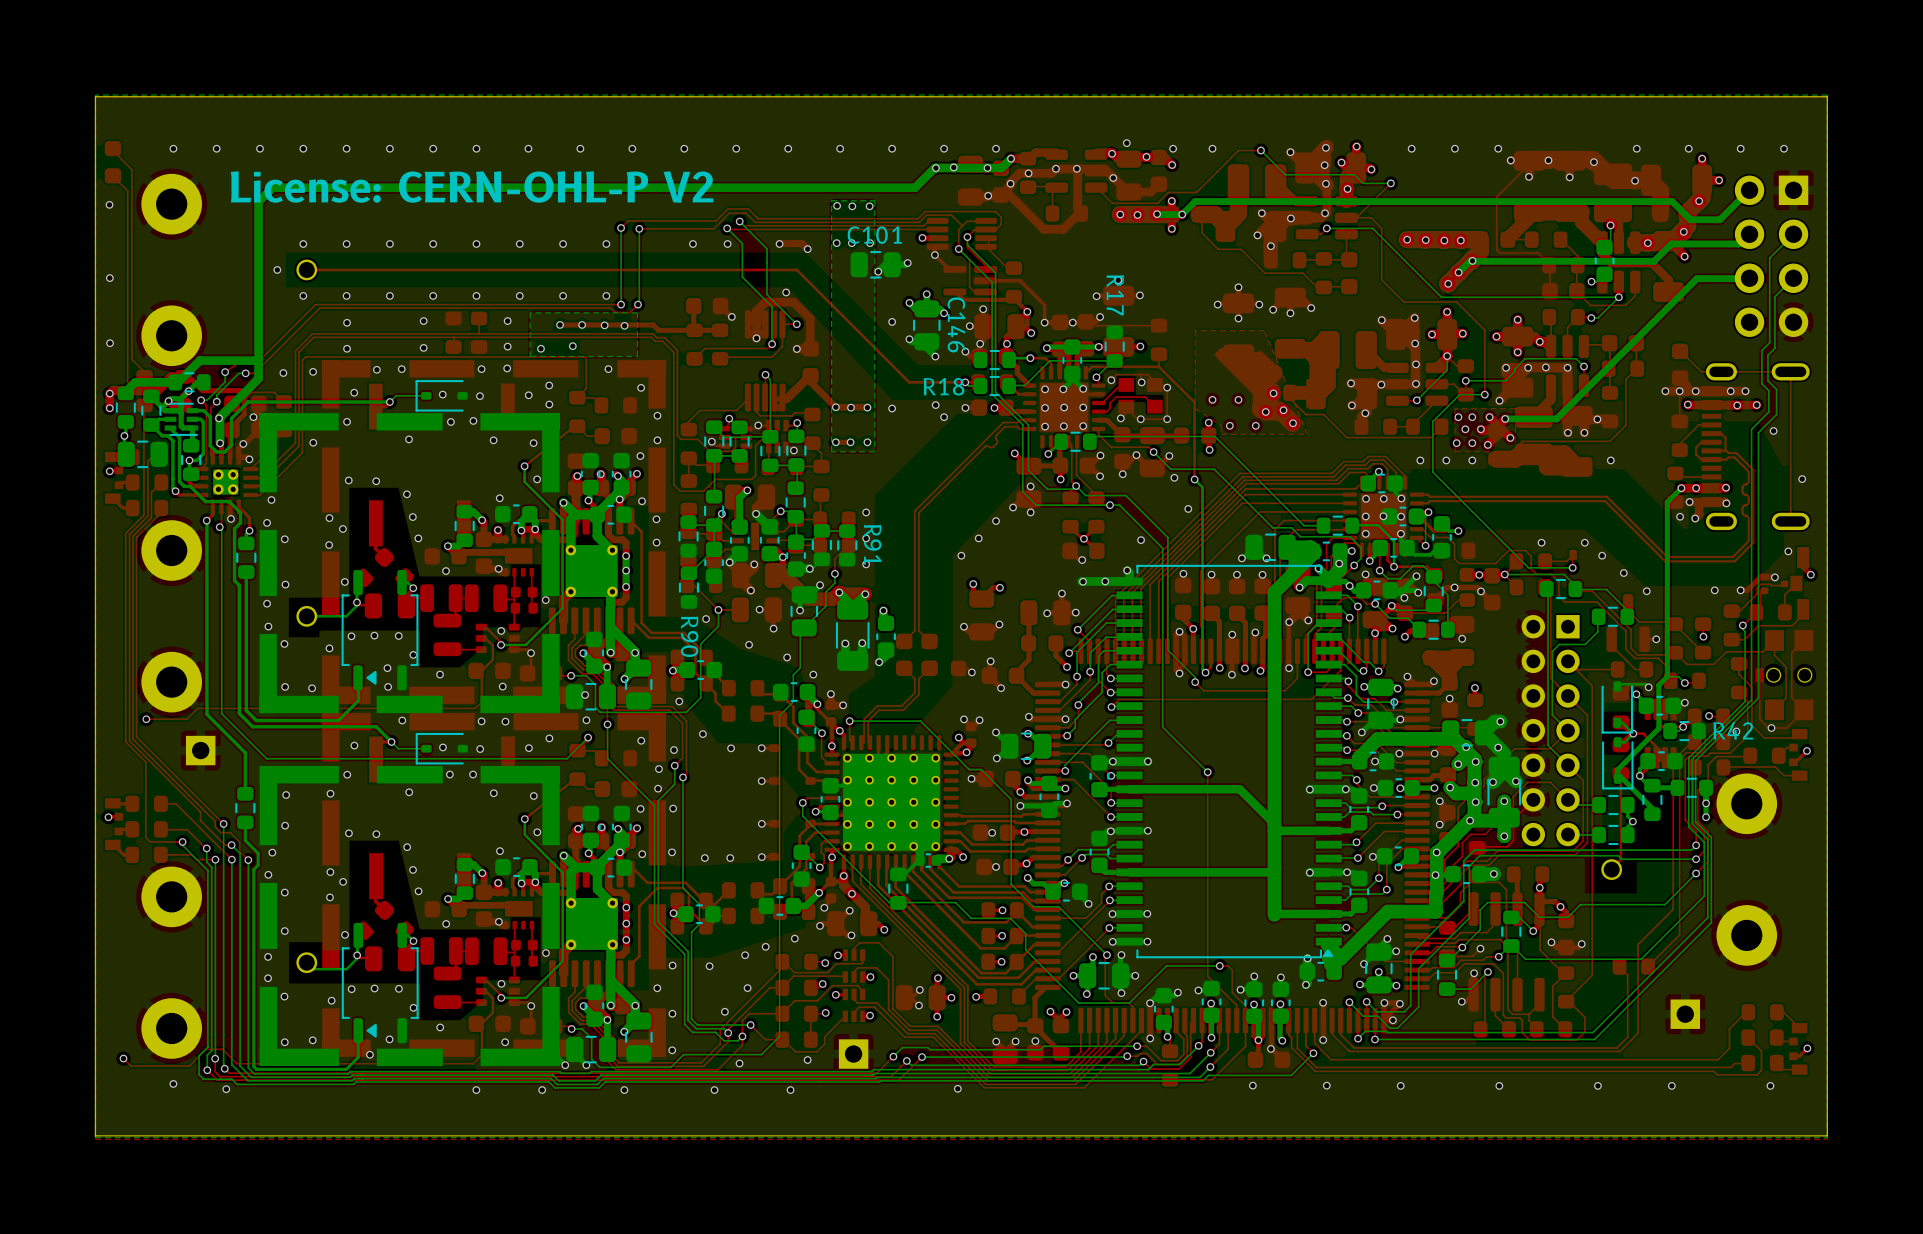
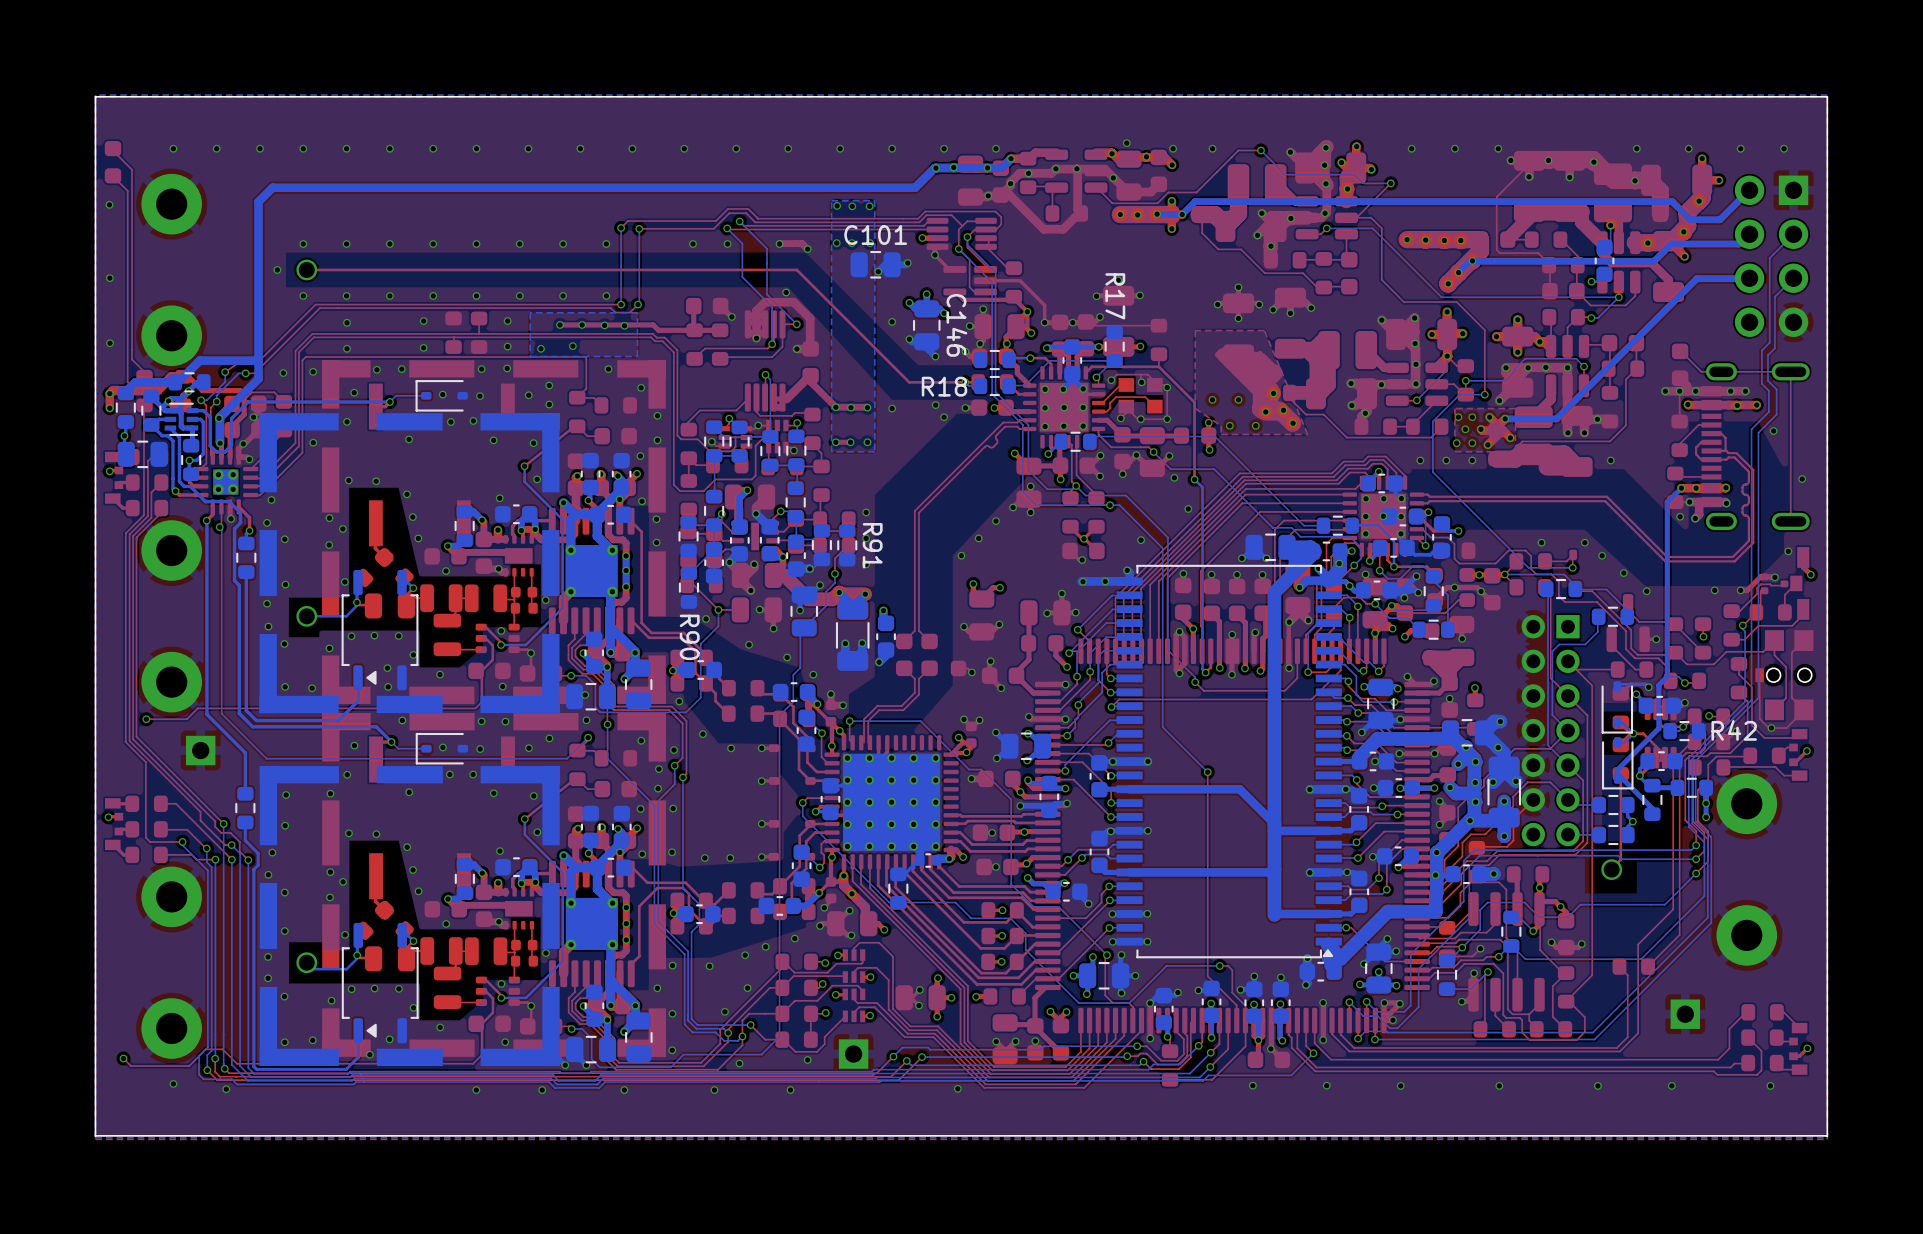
text: License: CERN-OHL-P V2 (472, 187) -> none

